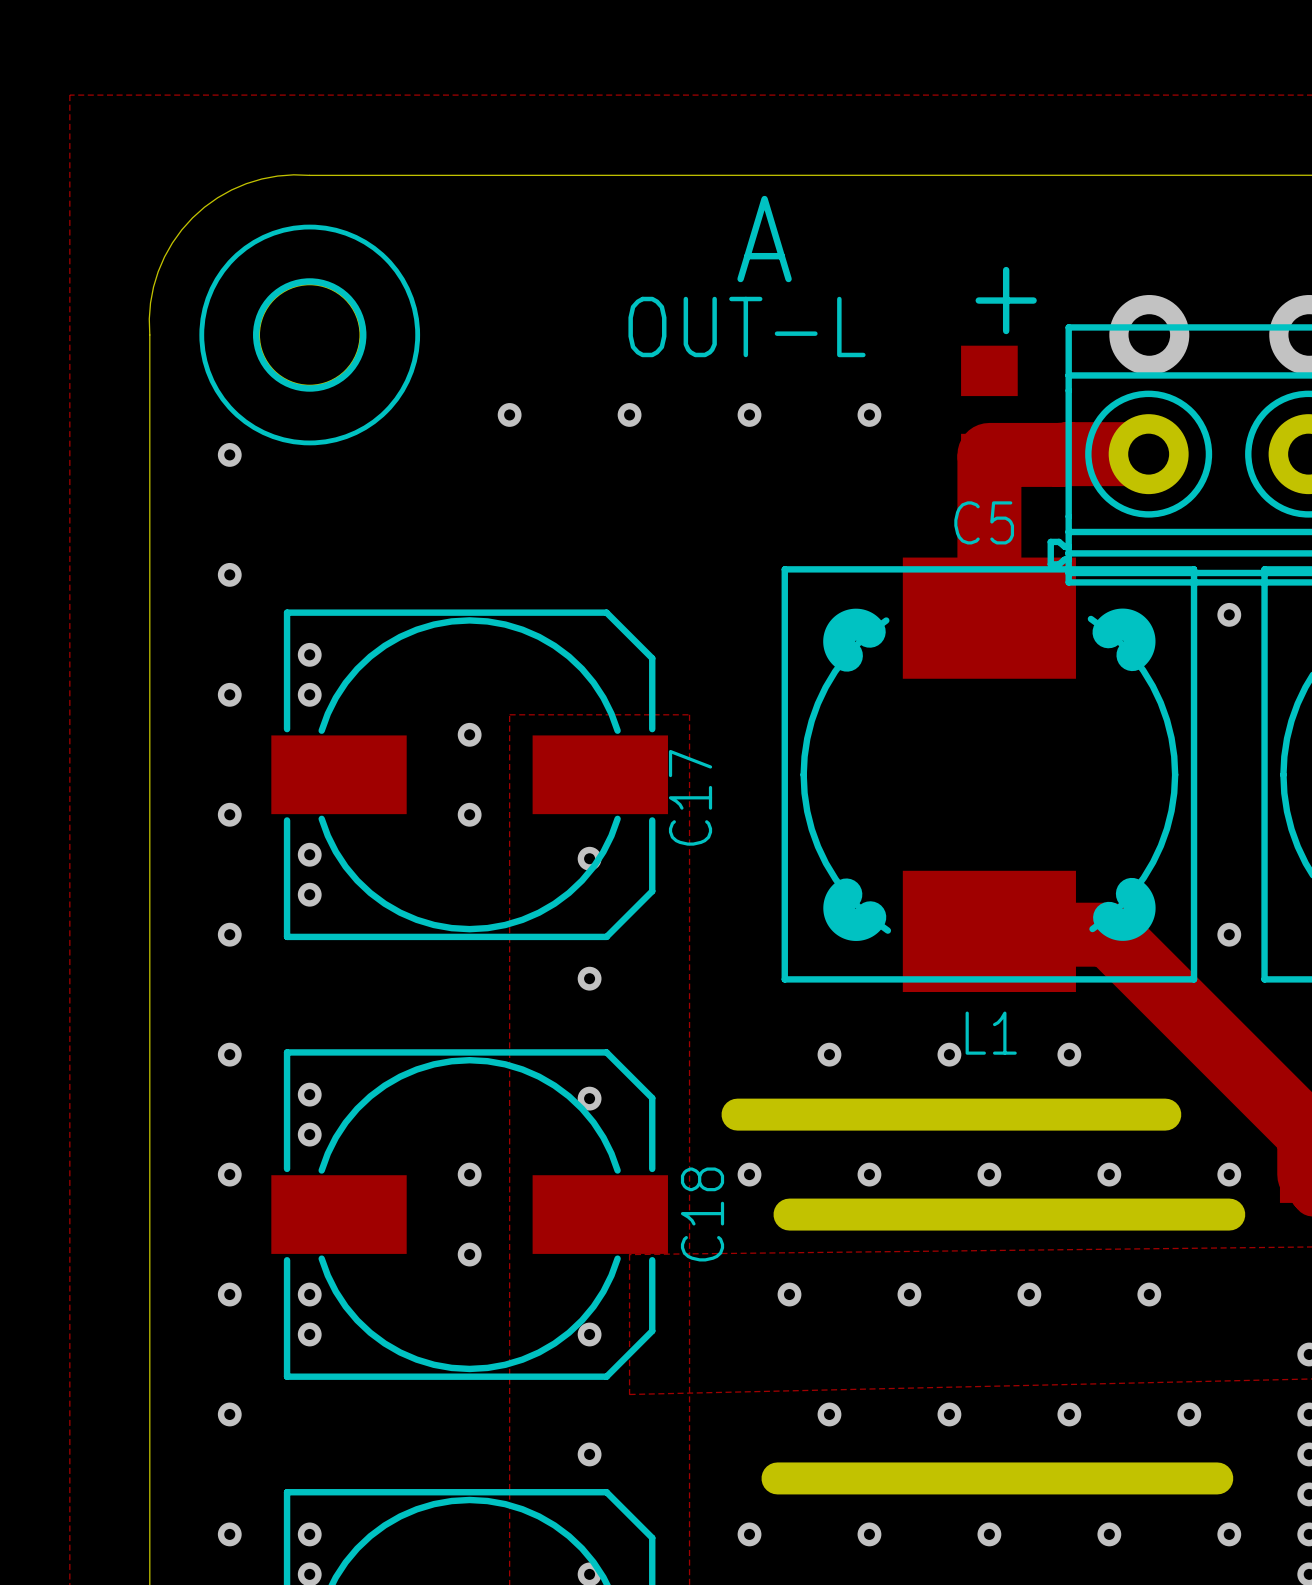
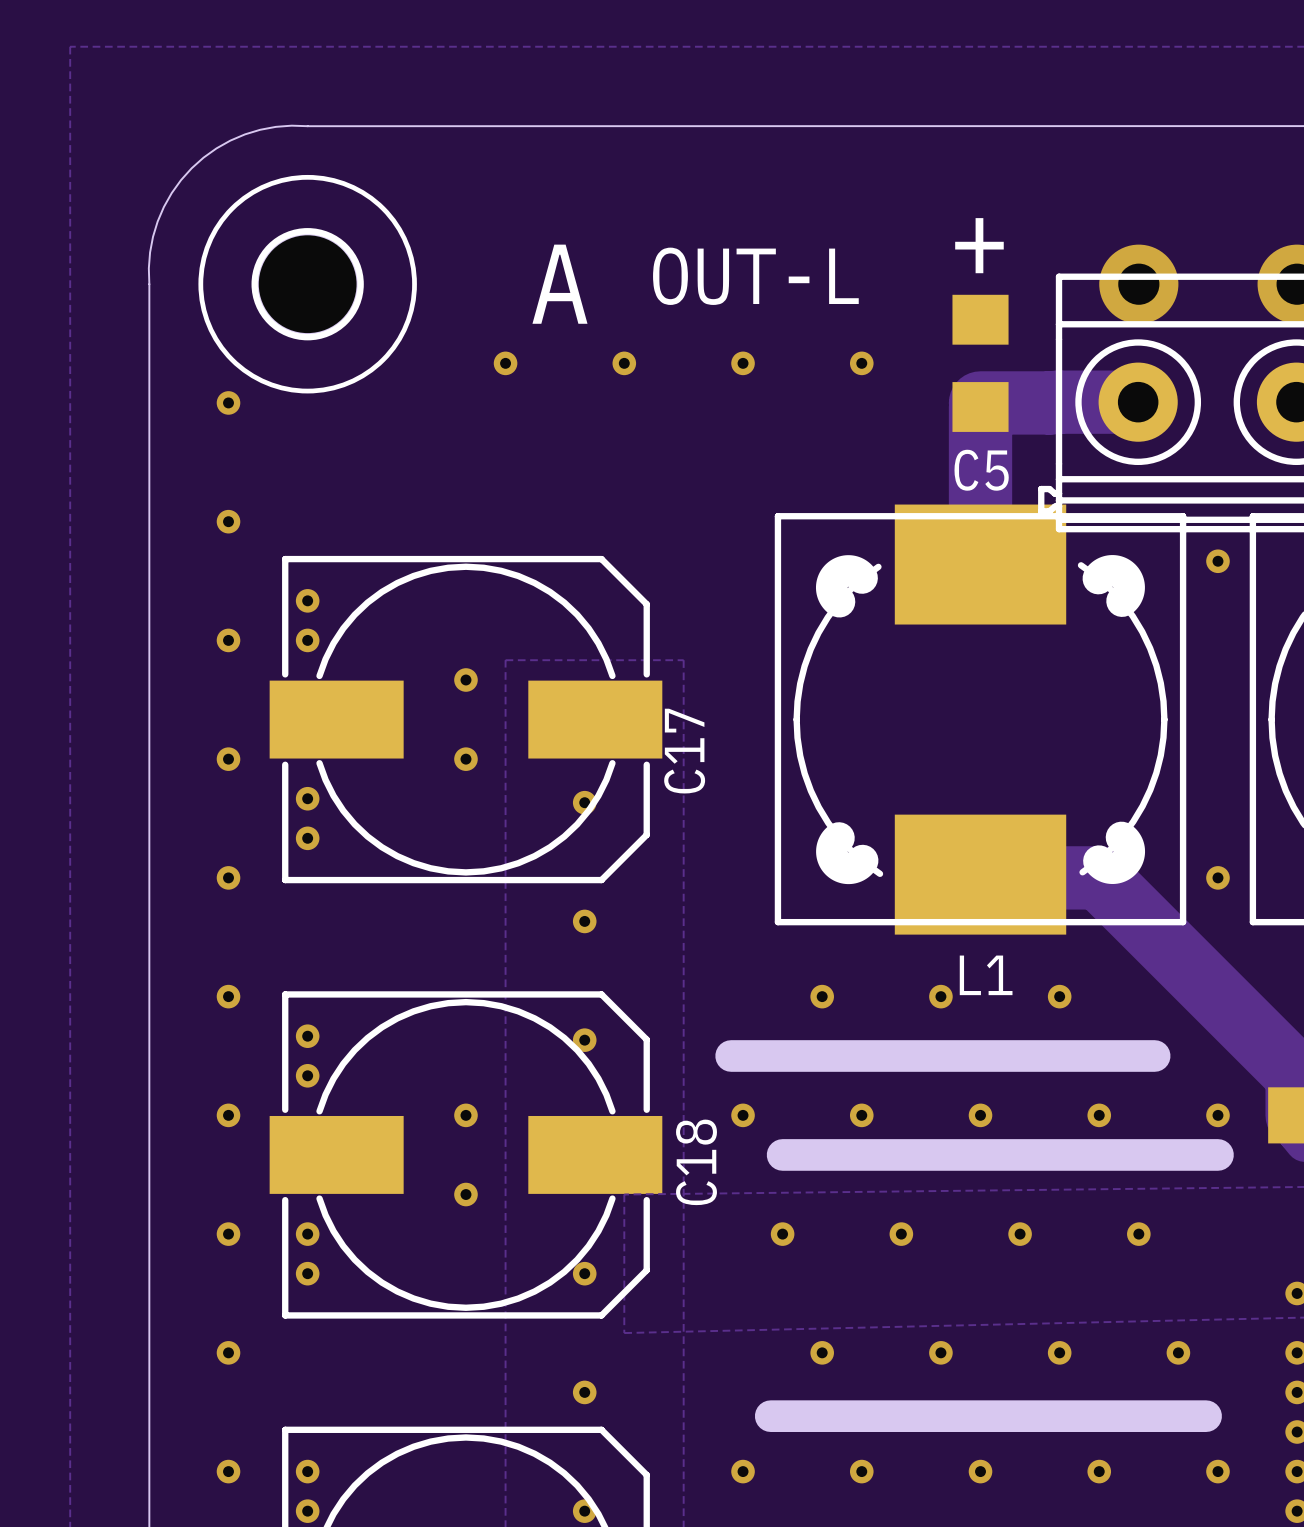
text position: A (764, 239) -> A (559, 284)

